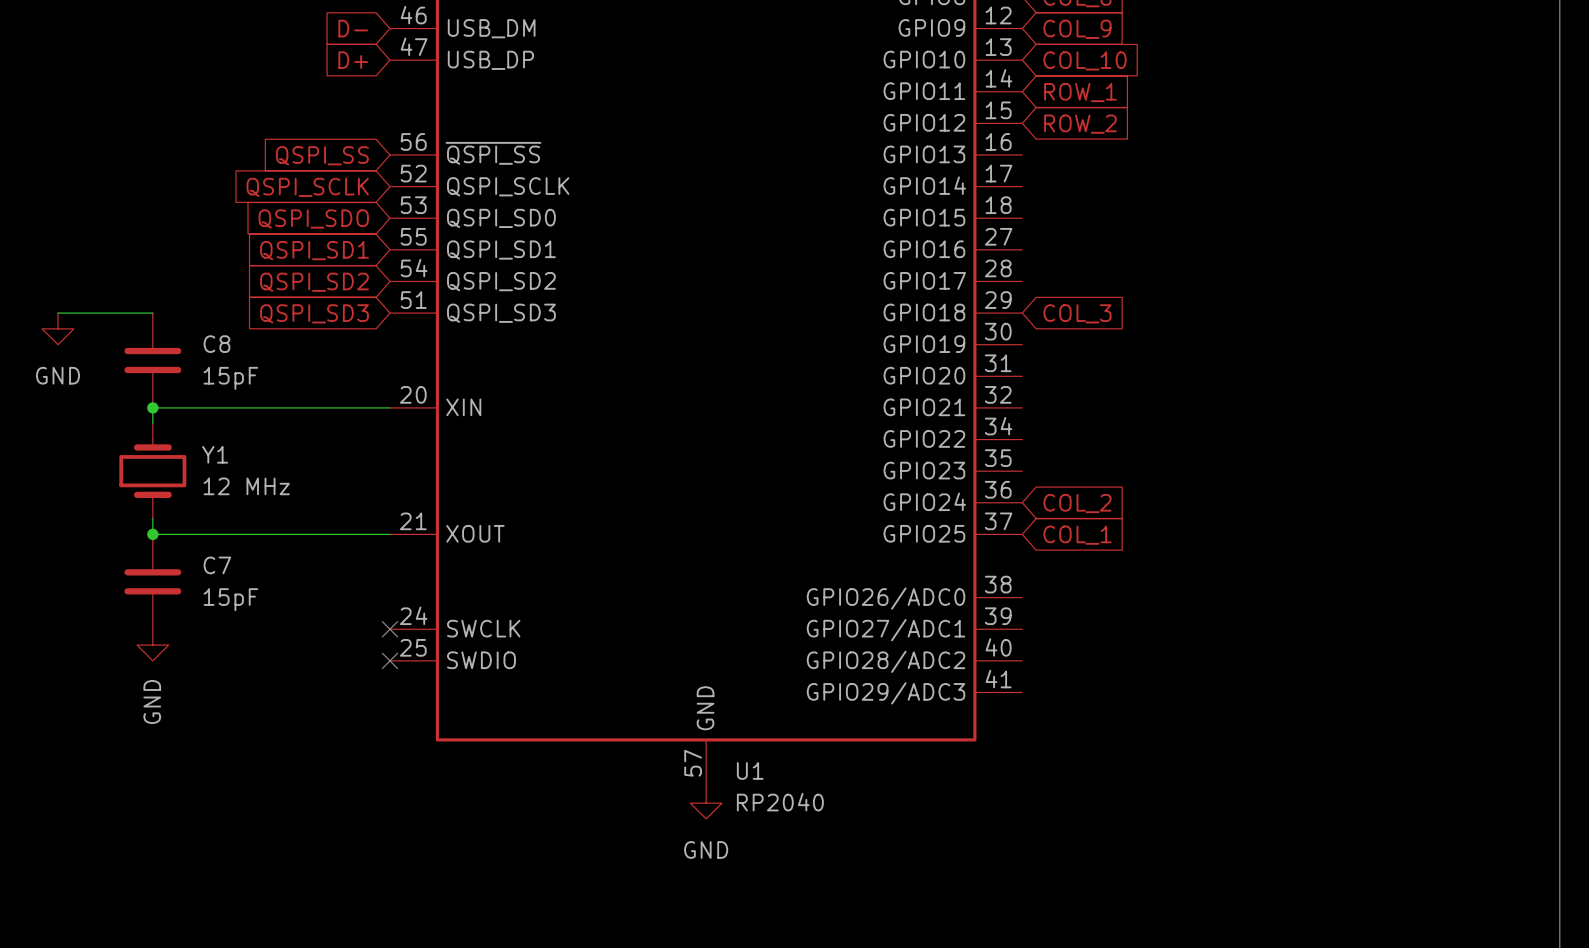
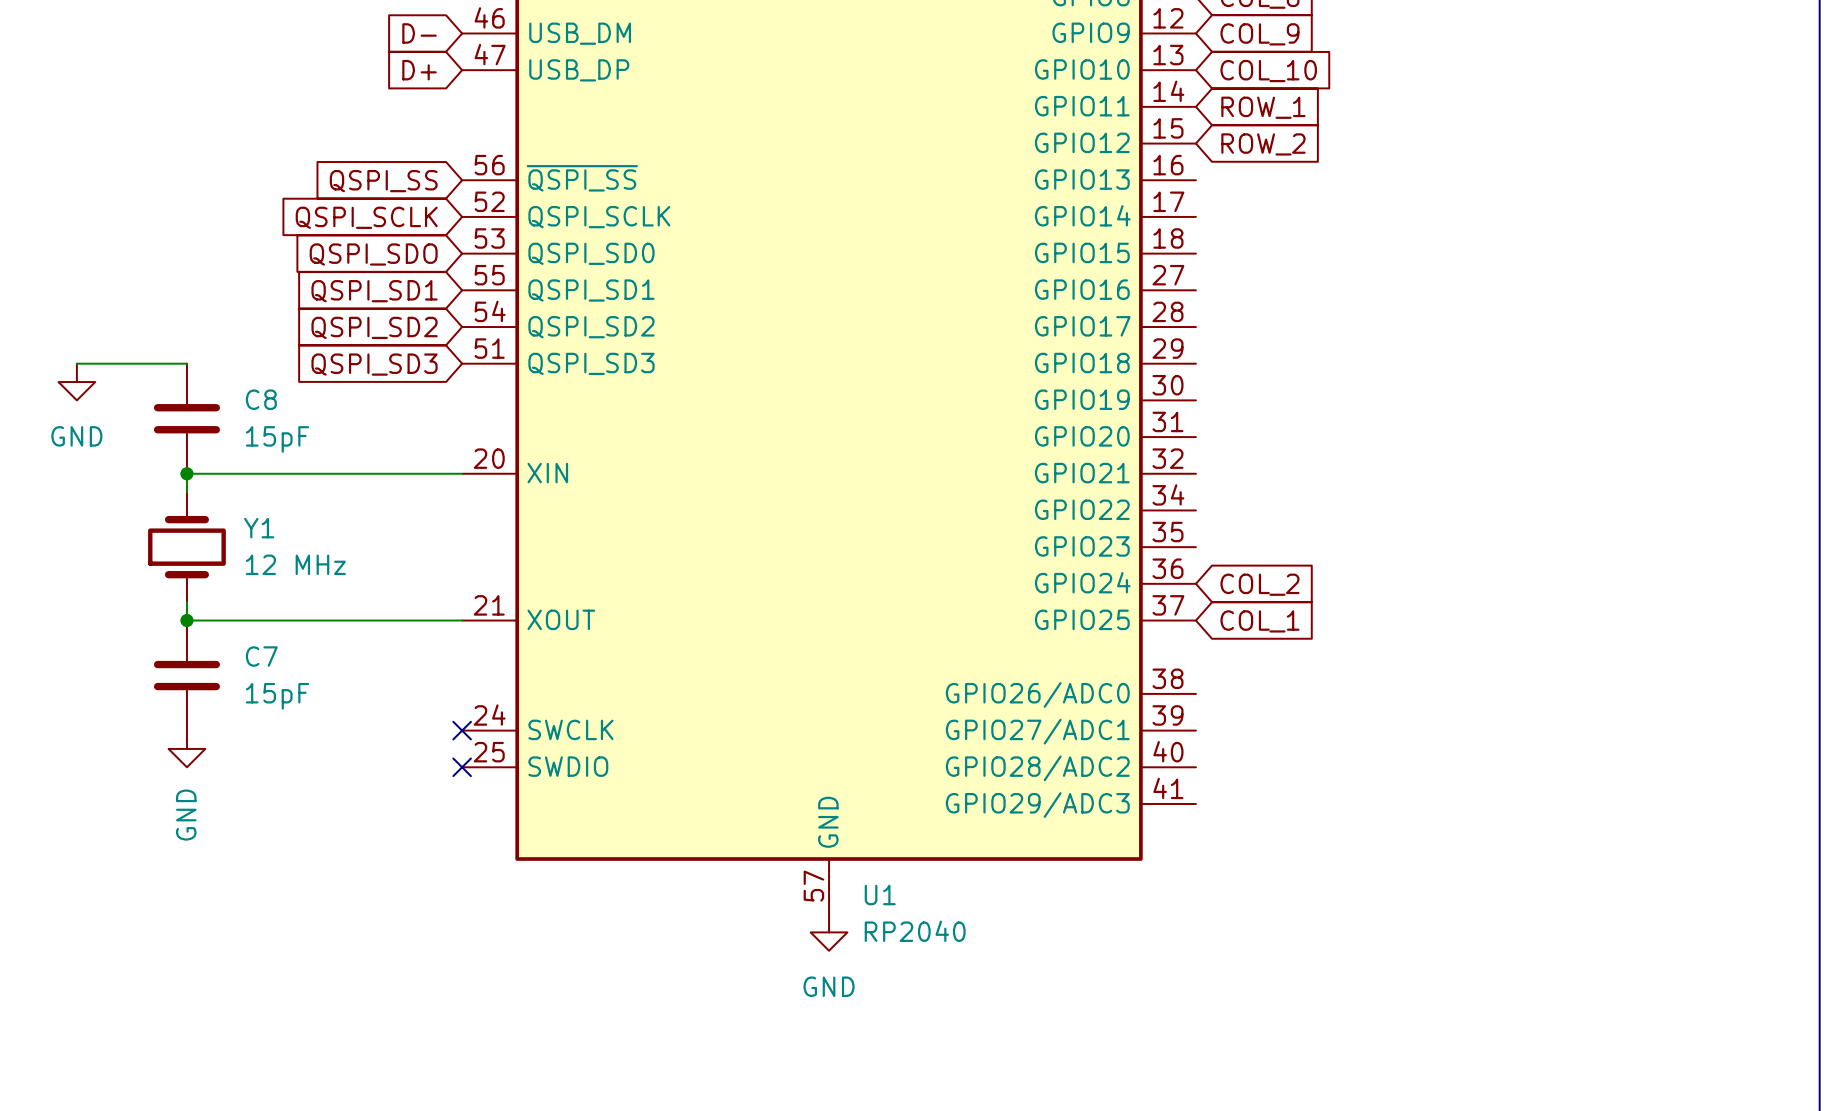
global label: COL_3 (1077, 313) -> none

